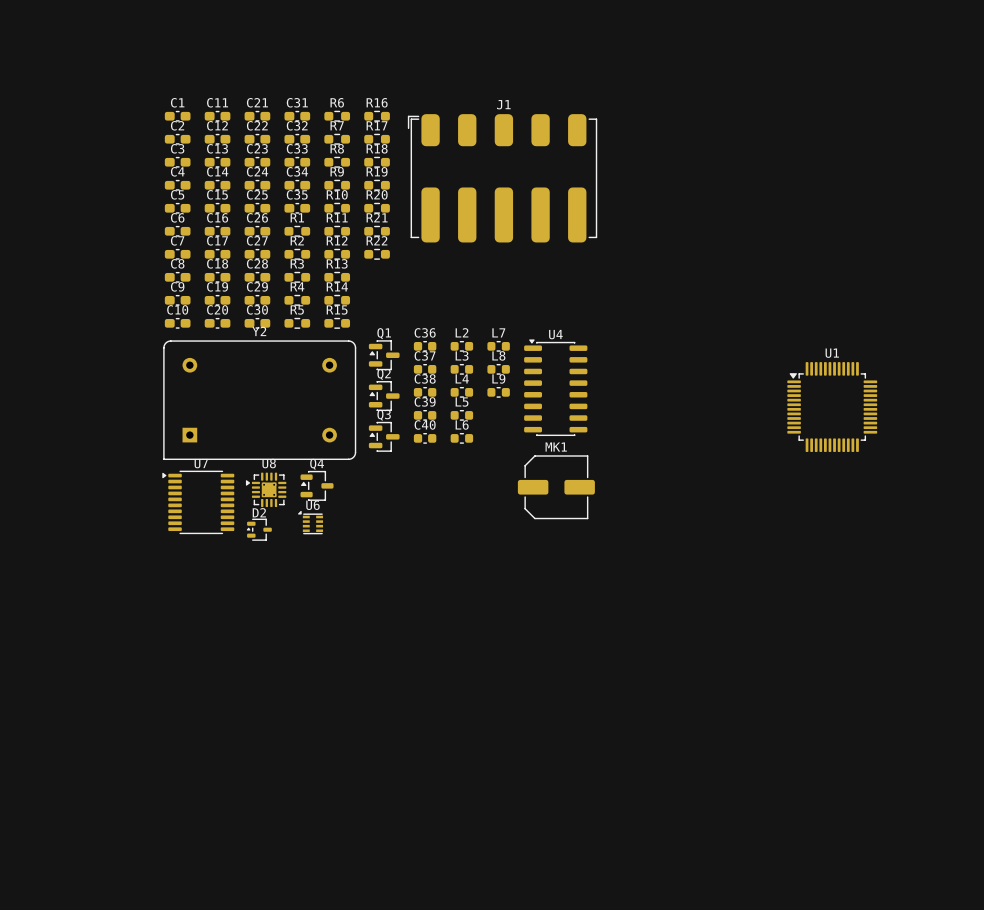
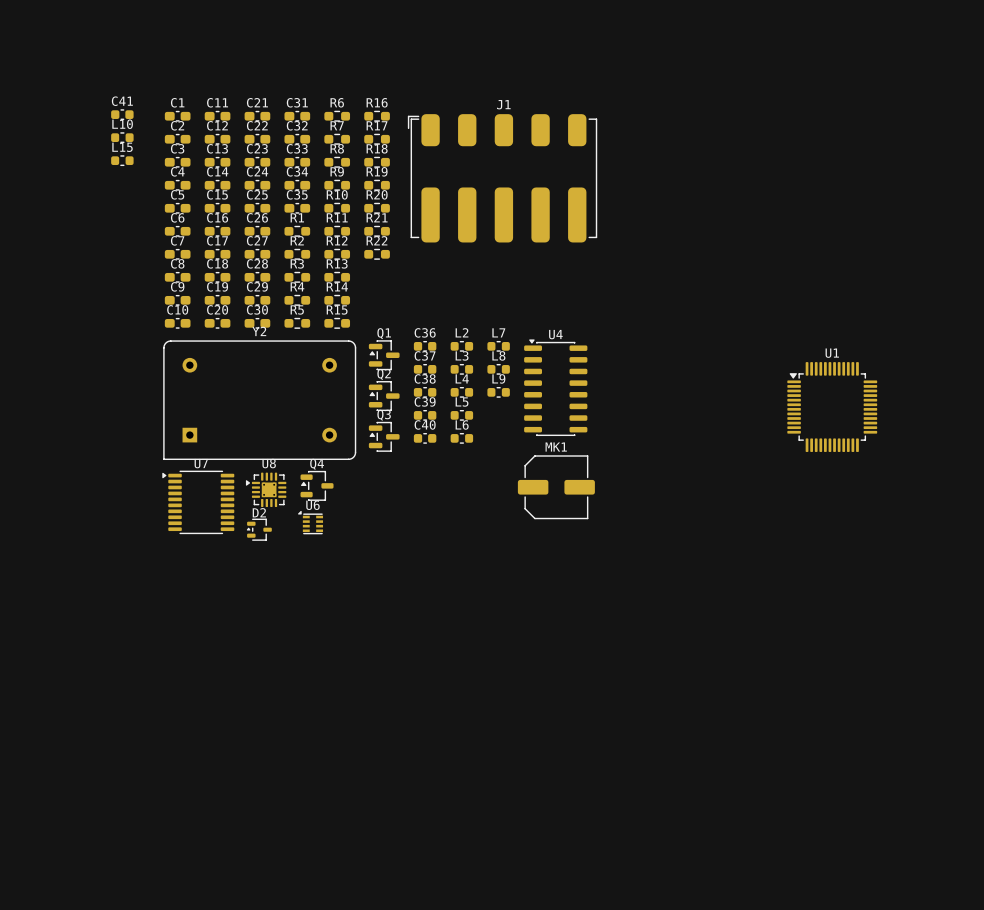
C41: none -> (122, 114)
L10: none -> (122, 137)
L15: none -> (122, 160)

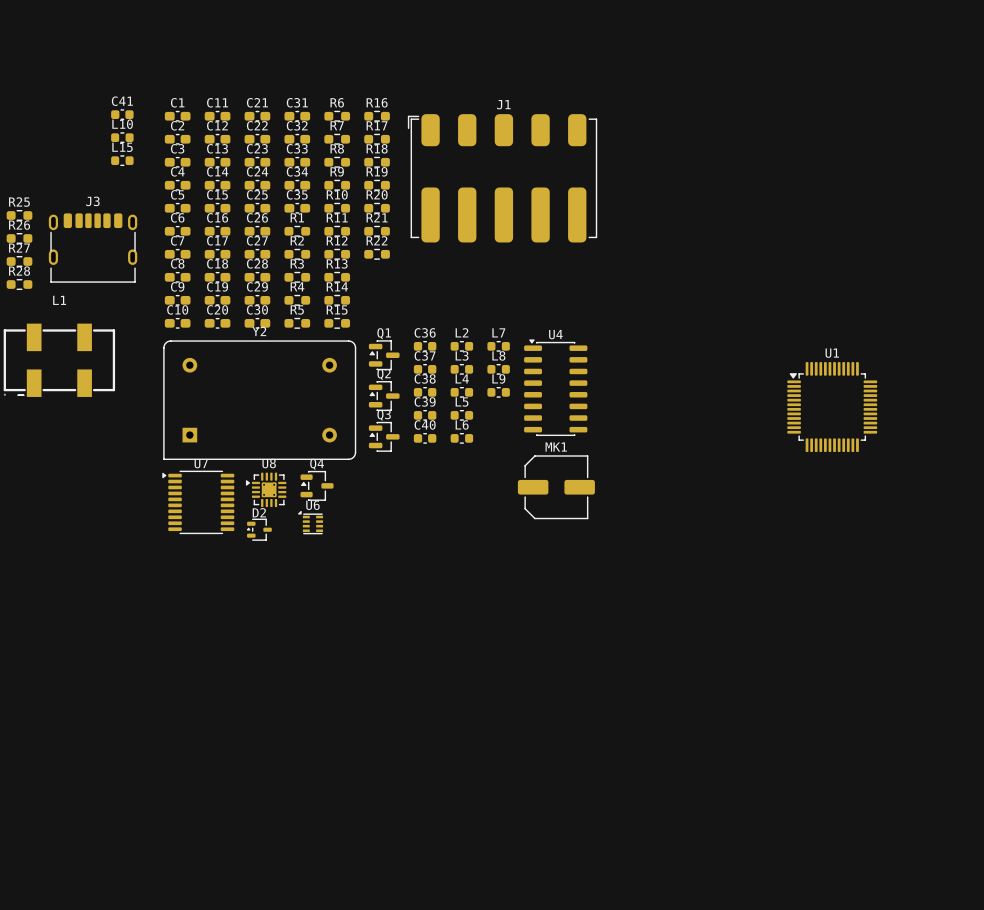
R25: none -> (19, 215)
R26: none -> (19, 238)
J3: none -> (93, 247)
R27: none -> (19, 261)
R28: none -> (19, 284)
L1: none -> (59, 360)

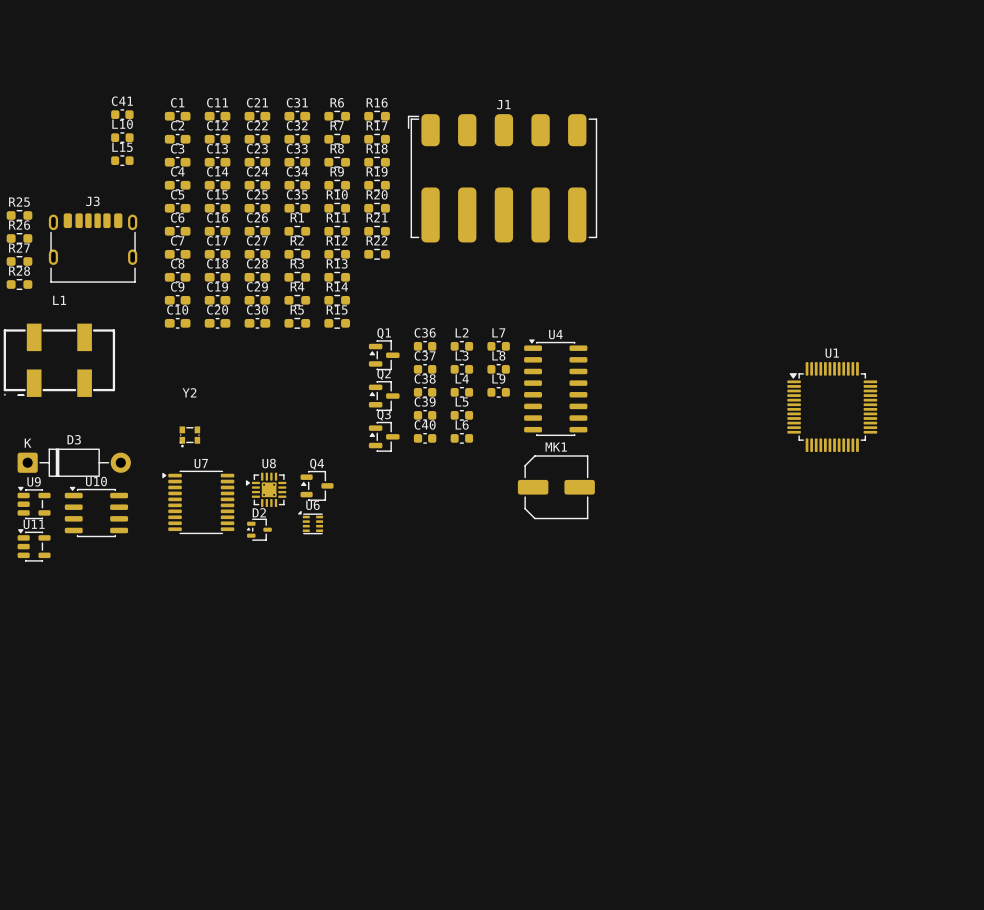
Y2 name position: Y2 (259, 331) -> Y2 (189, 392)
Y2 footprint: [163, 340, 357, 460] -> [179, 426, 201, 448]
D3: none -> (74, 462)
U9: none -> (34, 502)
U10: none -> (96, 511)
U11: none -> (34, 545)

